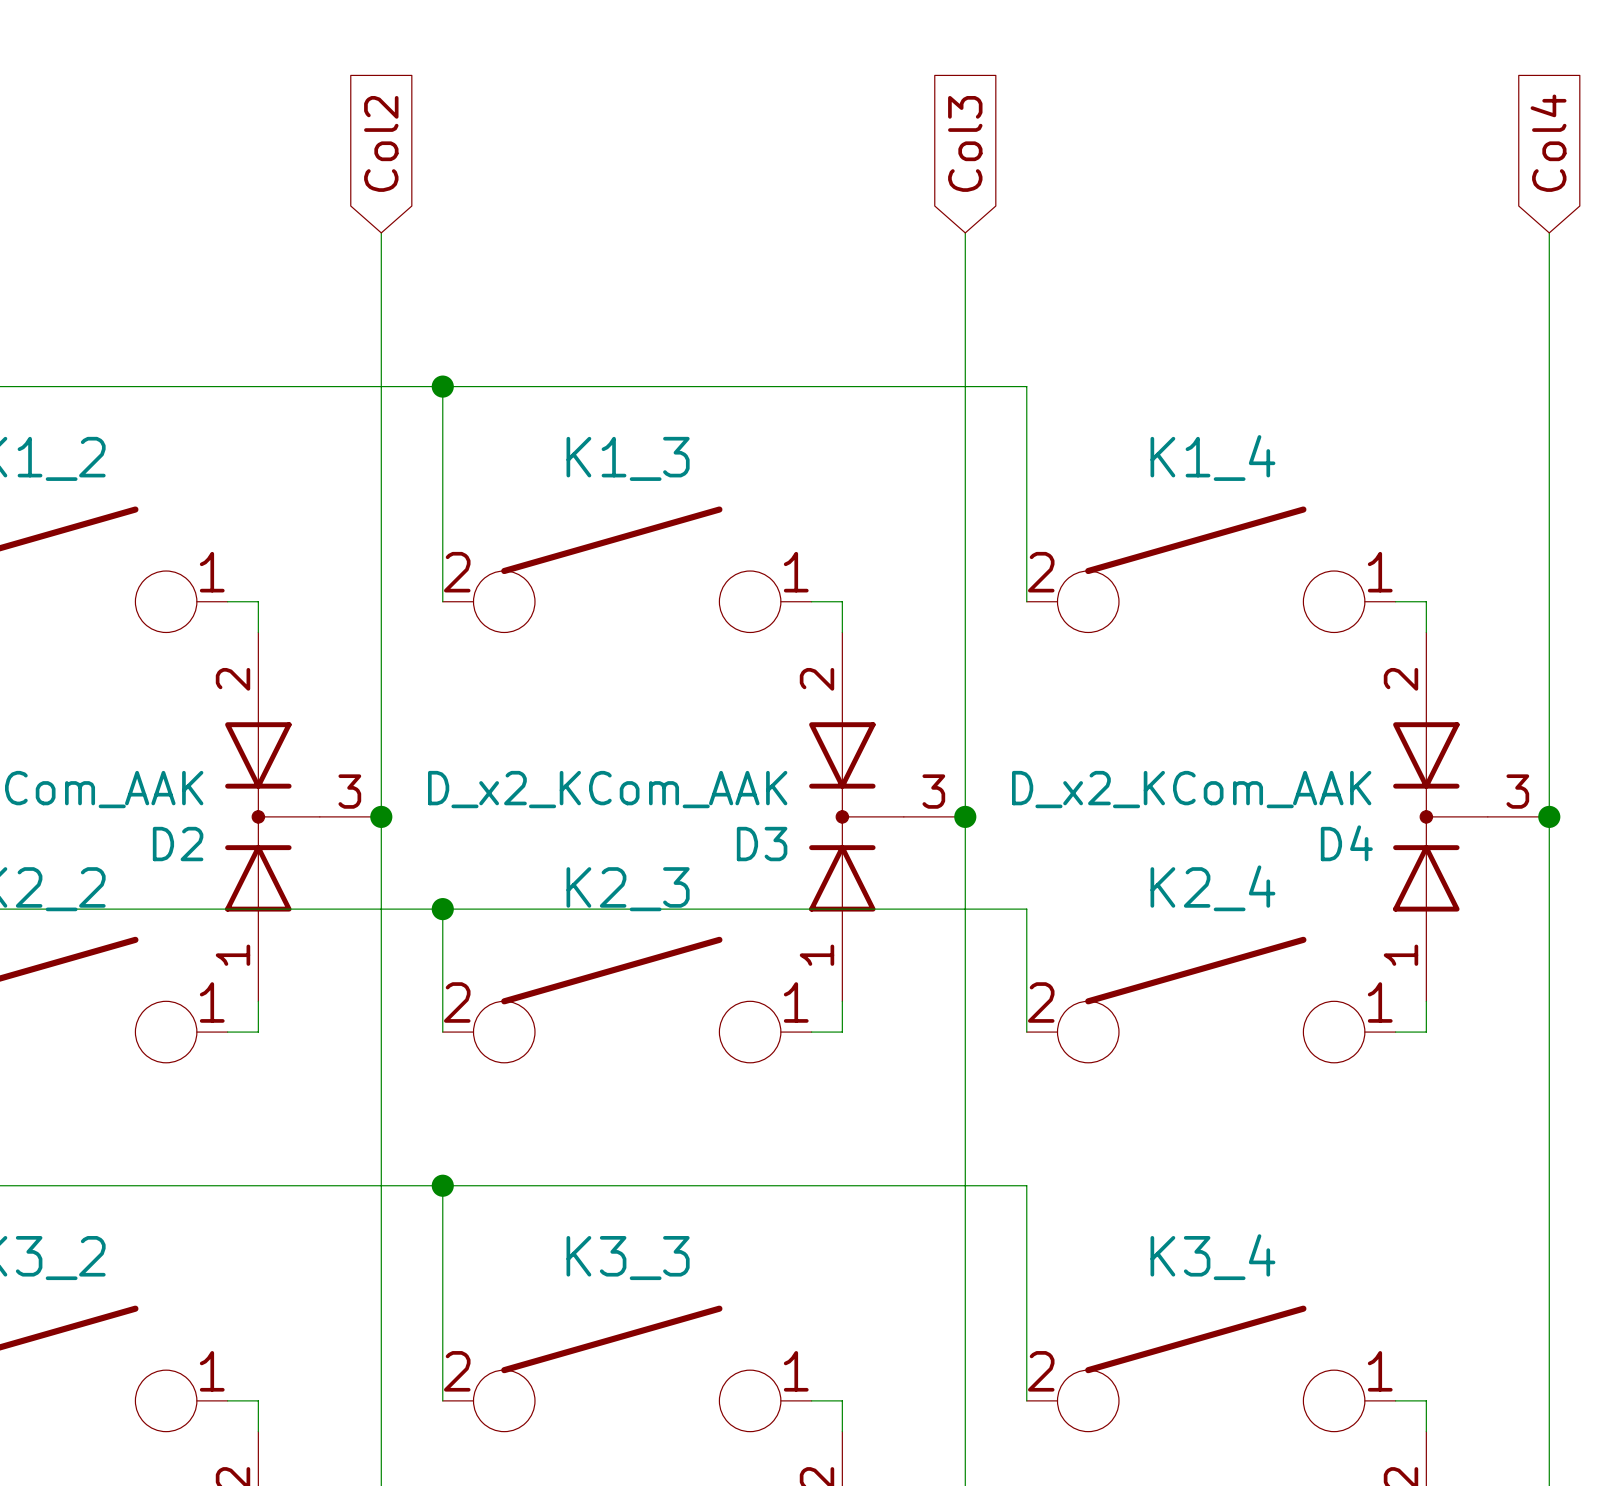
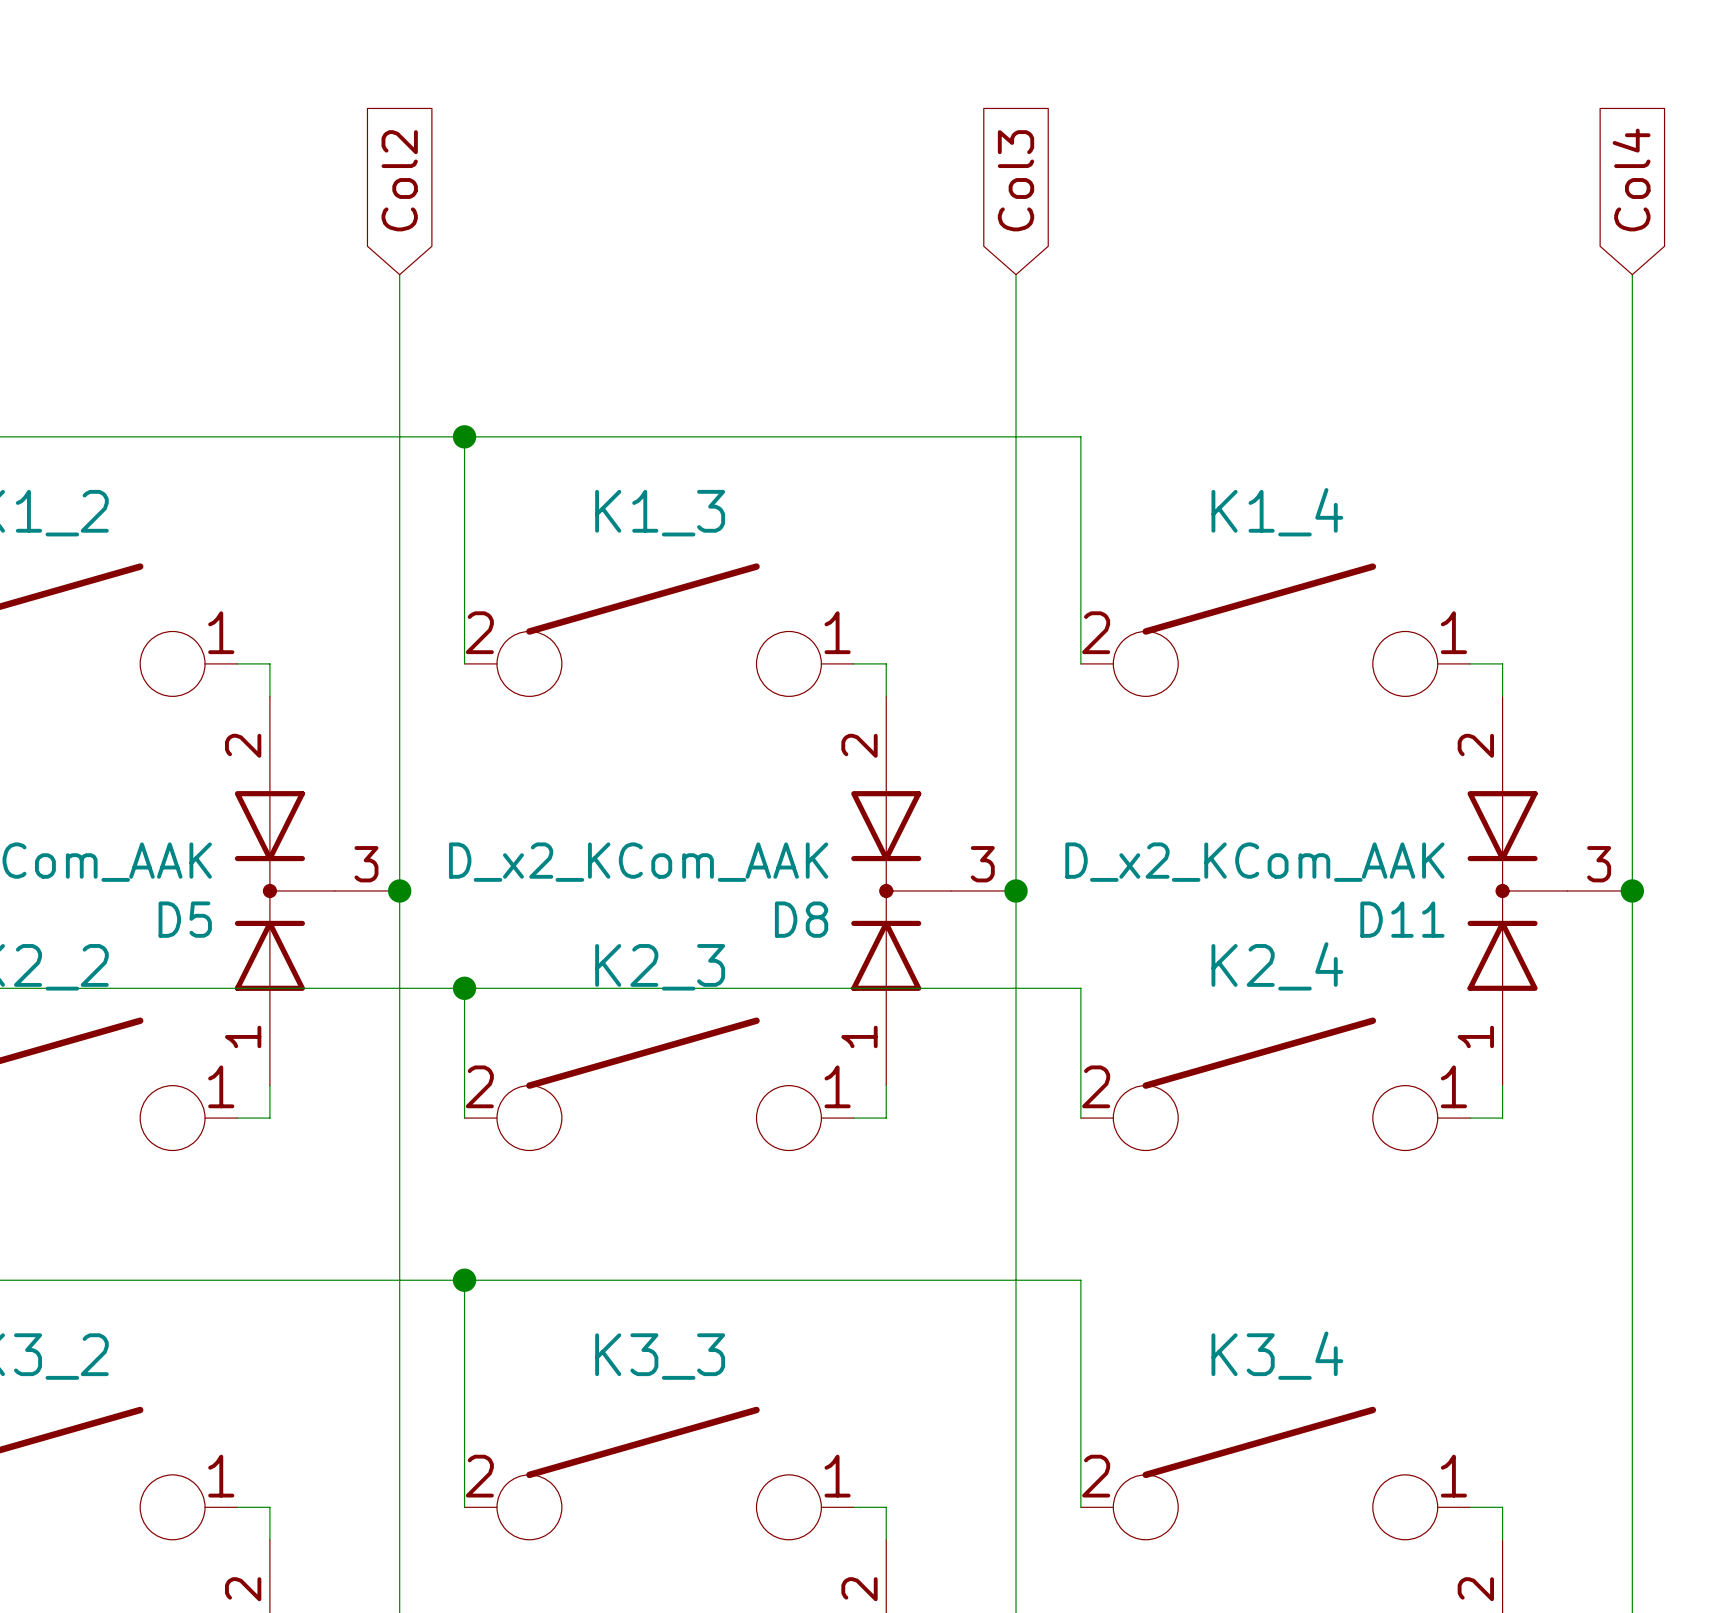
D4 name: D4 (1346, 843) -> D11 (1402, 919)
D2 name: D2 (178, 844) -> D5 (185, 919)
D3 name: D3 (762, 844) -> D8 (801, 919)

